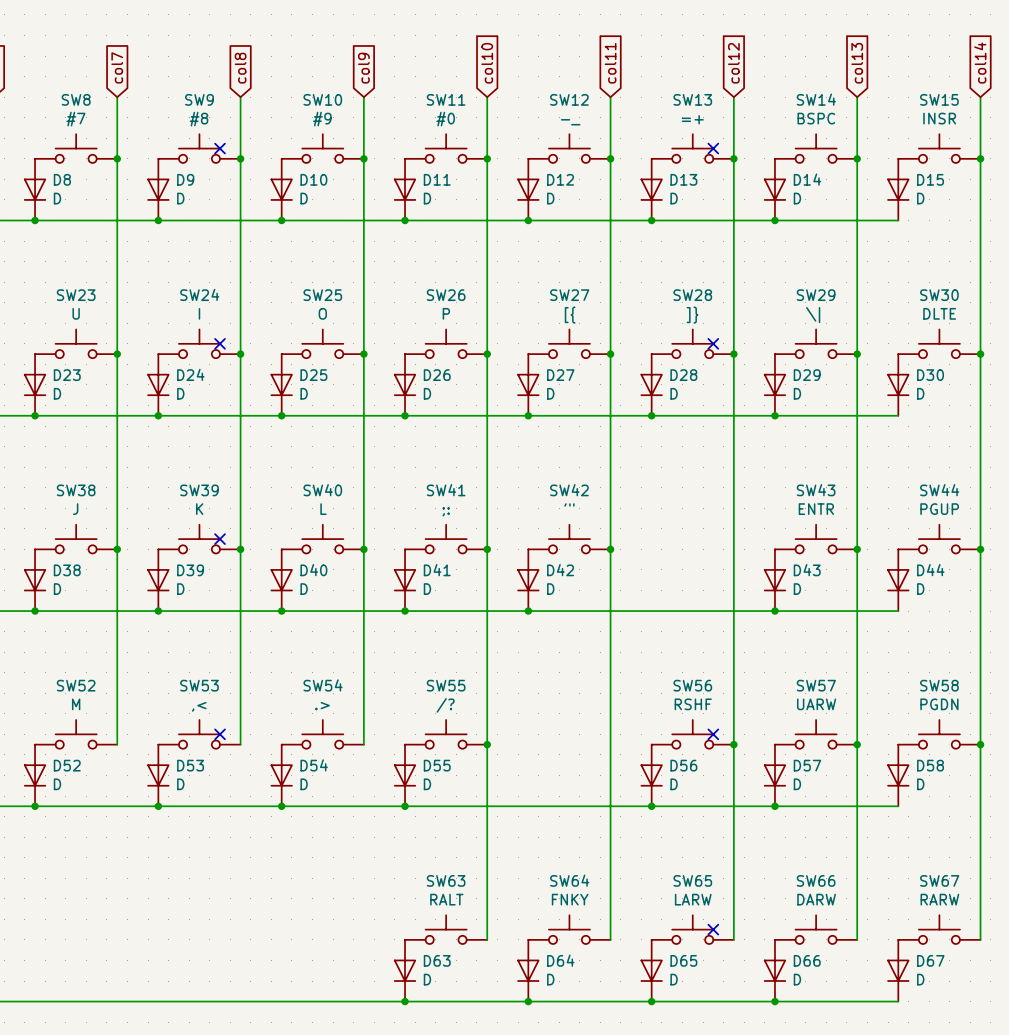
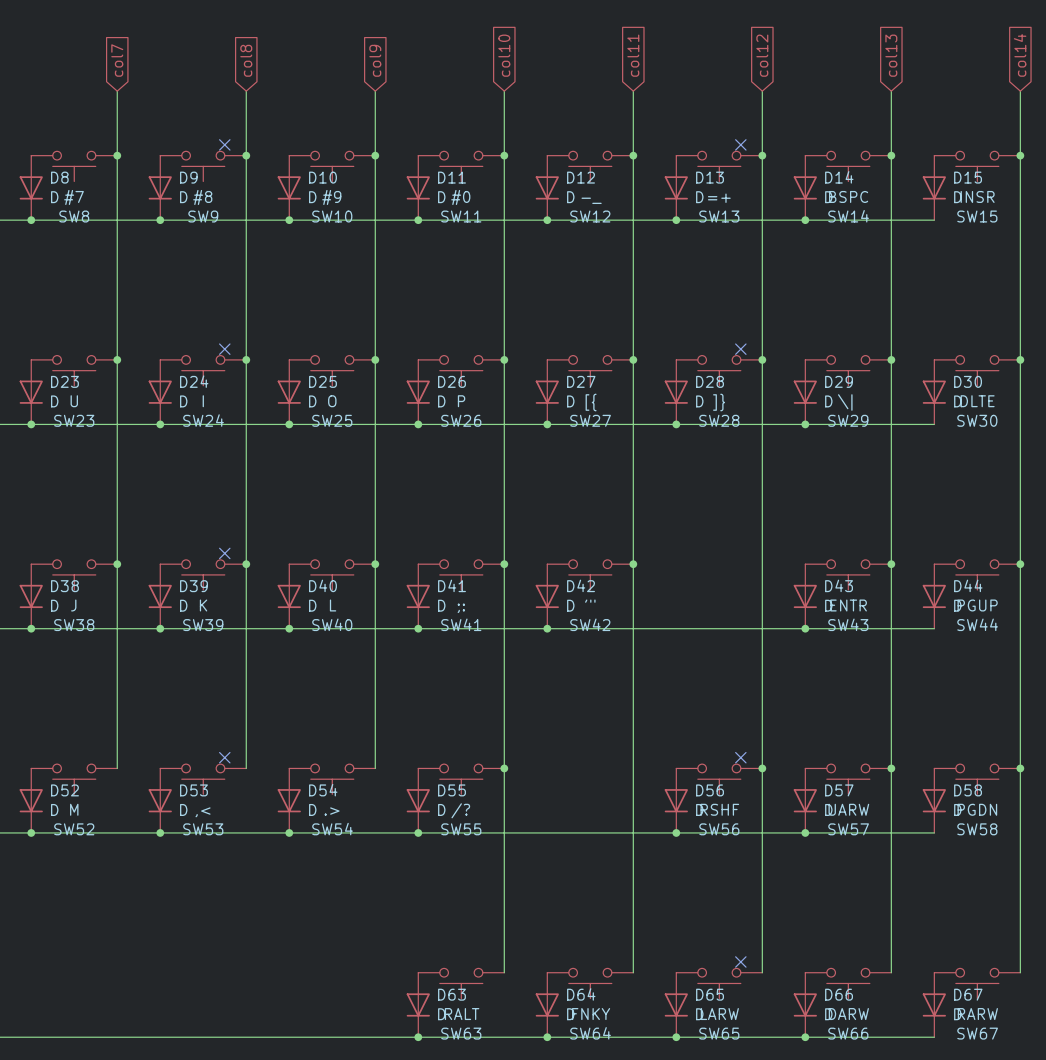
SW8 rotation: 0° (76, 148) -> 180° (74, 166)
SW9 rotation: 0° (199, 148) -> 180° (203, 166)
SW10 rotation: 0° (322, 148) -> 180° (332, 166)
SW11 rotation: 0° (446, 148) -> 180° (461, 166)
SW12 rotation: 0° (569, 148) -> 180° (590, 166)
SW13 rotation: 0° (692, 148) -> 180° (719, 166)
SW14 rotation: 0° (816, 148) -> 180° (848, 166)
SW15 rotation: 0° (939, 148) -> 180° (977, 166)
SW23 rotation: 0° (76, 343) -> 180° (74, 370)
SW24 rotation: 0° (199, 343) -> 180° (203, 370)
SW25 rotation: 0° (322, 343) -> 180° (332, 370)
SW26 rotation: 0° (446, 343) -> 180° (461, 370)
SW27 rotation: 0° (569, 343) -> 180° (590, 370)
SW28 rotation: 0° (692, 343) -> 180° (719, 370)
SW29 rotation: 0° (816, 343) -> 180° (848, 370)
SW30 rotation: 0° (939, 343) -> 180° (977, 370)
SW38 rotation: 0° (76, 539) -> 180° (74, 574)
SW39 rotation: 0° (199, 539) -> 180° (203, 574)
SW40 rotation: 0° (322, 539) -> 180° (332, 574)
SW41 rotation: 0° (446, 539) -> 180° (461, 574)
SW42 rotation: 0° (569, 539) -> 180° (590, 574)
SW43 rotation: 0° (816, 539) -> 180° (848, 574)
SW44 rotation: 0° (939, 539) -> 180° (977, 574)
SW52 rotation: 0° (76, 734) -> 180° (74, 779)
SW53 rotation: 0° (199, 734) -> 180° (203, 779)
SW54 rotation: 0° (322, 734) -> 180° (332, 779)
SW55 rotation: 0° (446, 734) -> 180° (461, 779)
SW56 rotation: 0° (692, 734) -> 180° (719, 779)
SW57 rotation: 0° (816, 734) -> 180° (848, 779)
SW58 rotation: 0° (939, 734) -> 180° (977, 779)
SW63 rotation: 0° (446, 929) -> 180° (461, 983)
SW64 rotation: 0° (569, 929) -> 180° (590, 983)
SW65 rotation: 0° (692, 929) -> 180° (719, 983)
SW66 rotation: 0° (816, 929) -> 180° (848, 983)
SW67 rotation: 0° (939, 929) -> 180° (977, 983)

